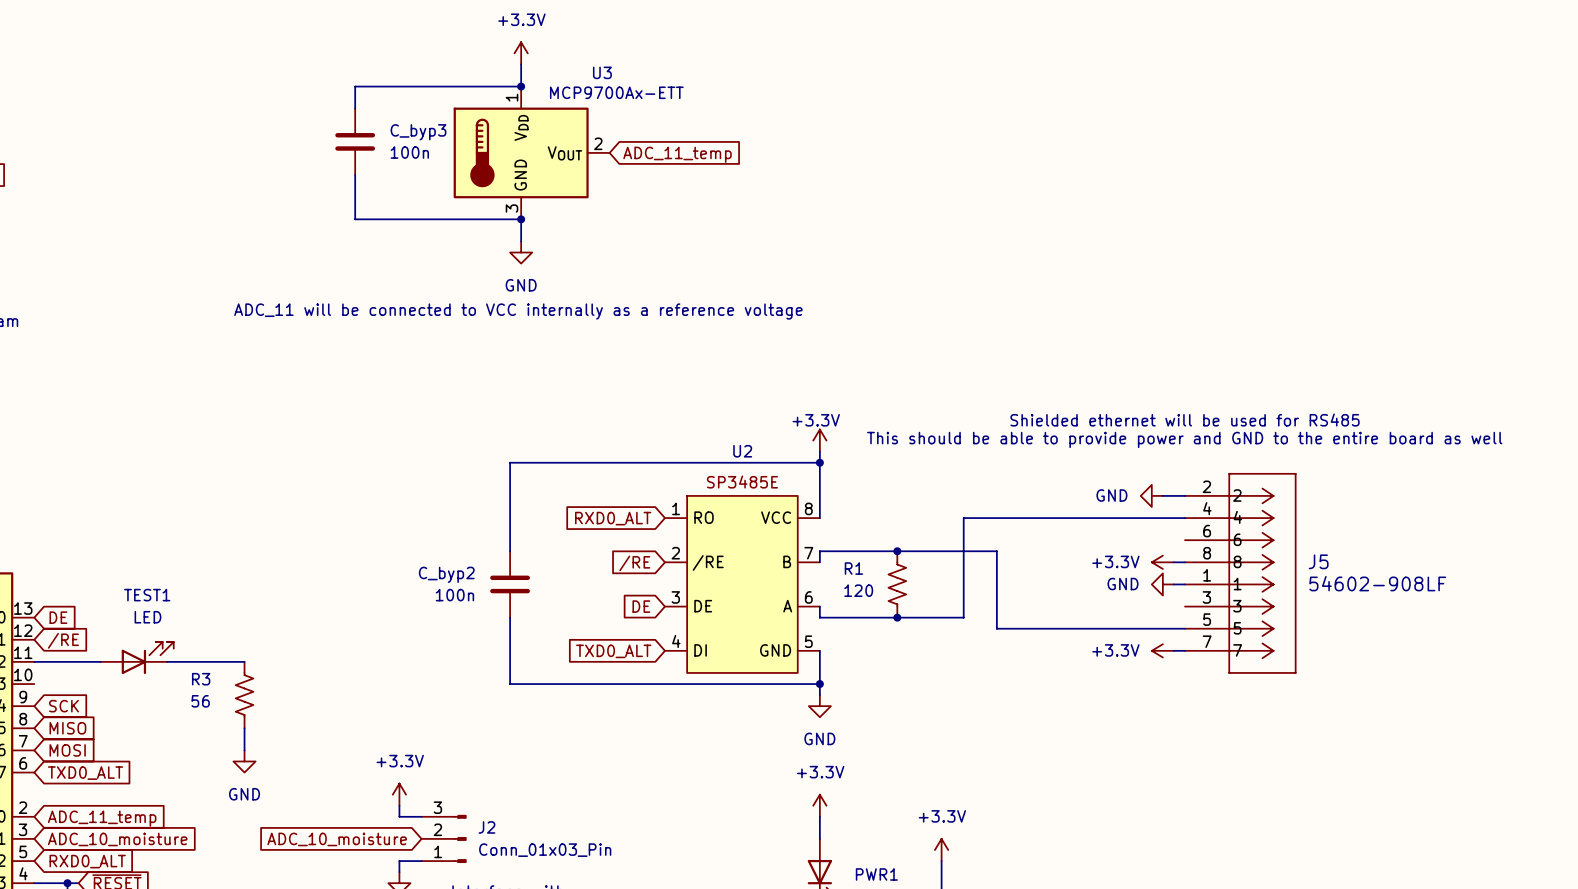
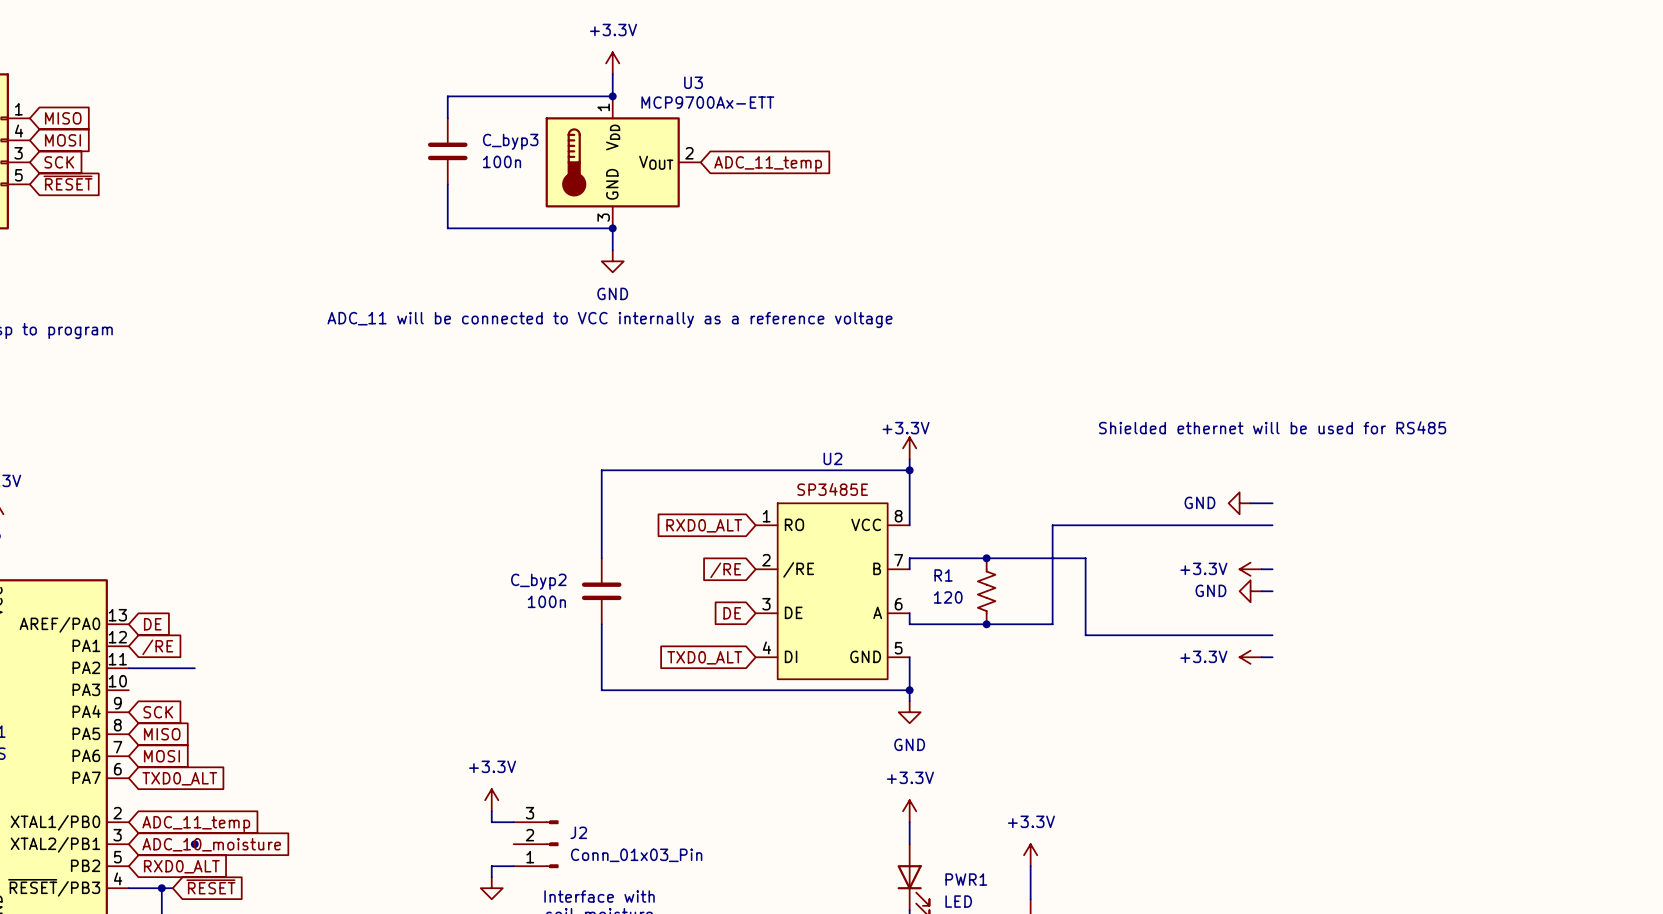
text: This should be able to provide power and GND to the entire board as well (1184, 439) -> none
J5: 54602-908LF (1240, 573) -> none
TEST1: LED (137, 658) -> none
wire: (167, 661) (244, 661) -> none
R3: 56 (244, 695) -> none
wire: (244, 728) (244, 750) -> none
power symbol: GND (244, 761) -> none
junction: none -> (194, 844)
global label: ADC_10_moisture (337, 839) -> none

